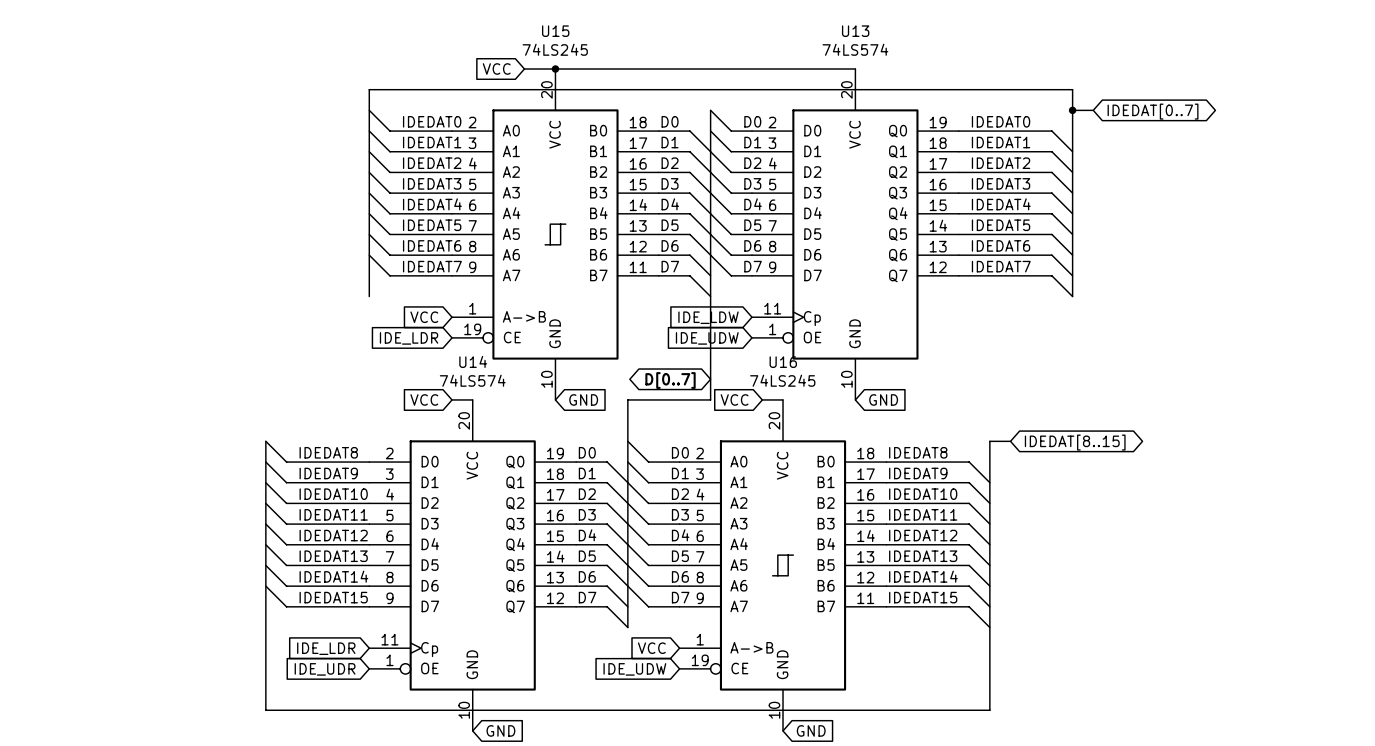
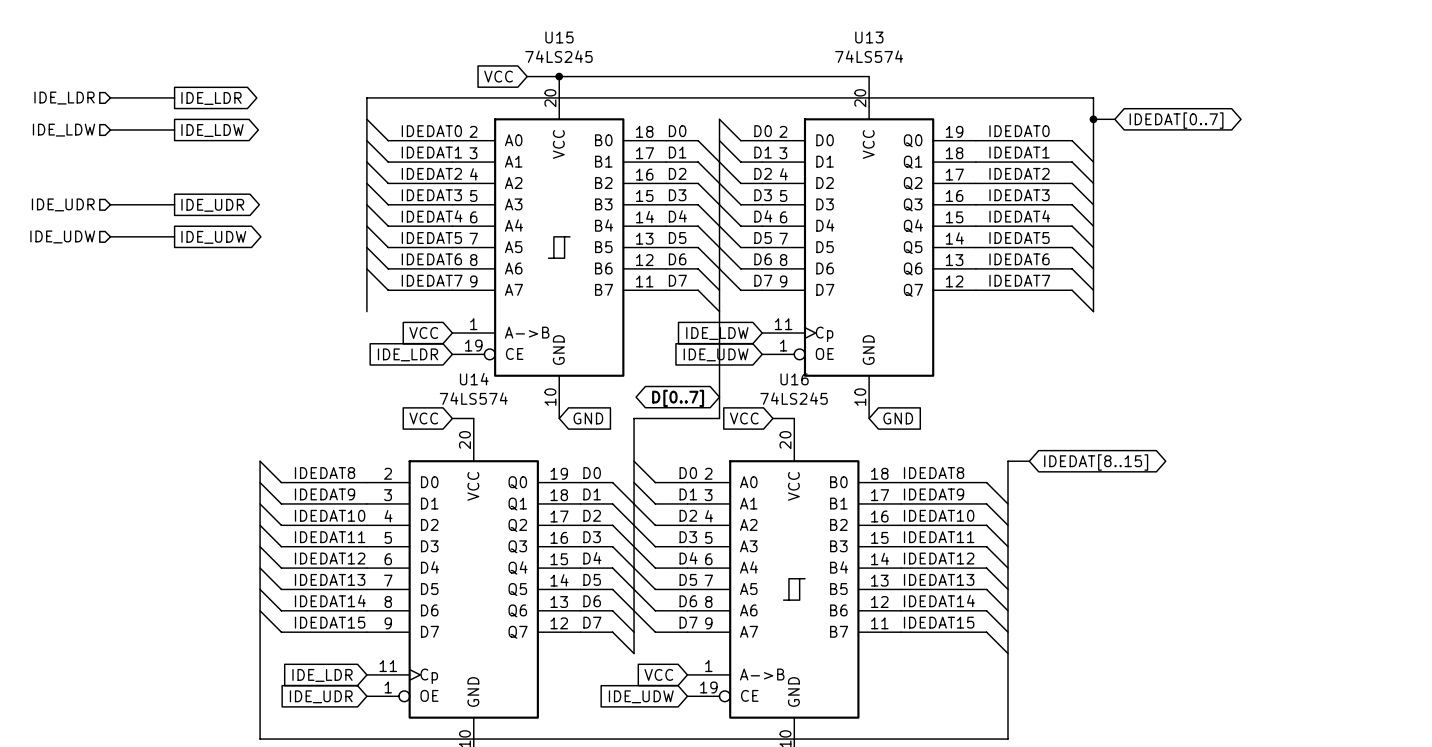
hierarchical label: none -> IDE_LDR (64, 98)
wire: none -> (110, 97) (174, 97)
global label: none -> IDE_LDR (211, 98)
hierarchical label: none -> IDE_LDW (64, 130)
wire: none -> (110, 130) (174, 130)
global label: none -> IDE_LDW (212, 130)
hierarchical label: none -> IDE_UDR (63, 204)
wire: none -> (110, 204) (174, 204)
global label: none -> IDE_UDR (212, 205)
hierarchical label: none -> IDE_UDW (62, 236)
wire: none -> (110, 236) (174, 236)
global label: none -> IDE_UDW (213, 237)

